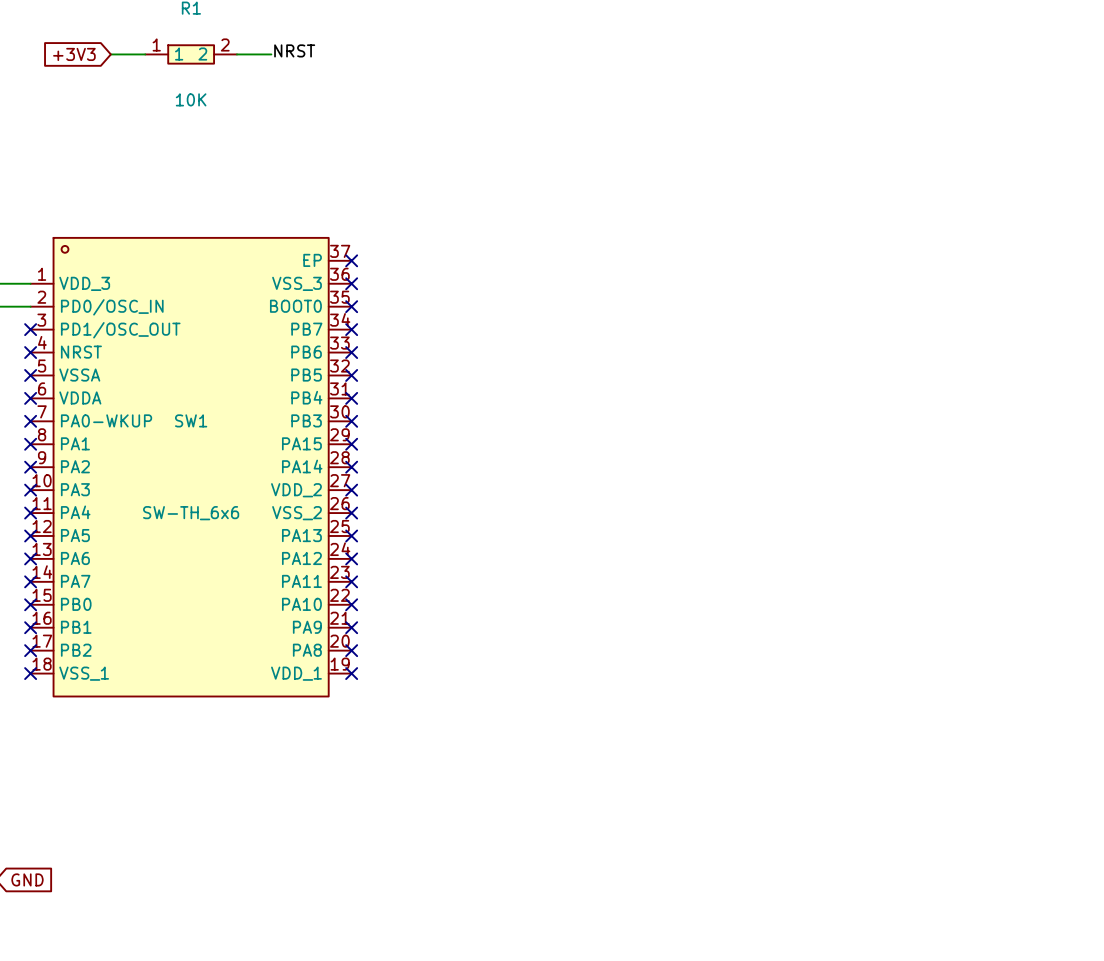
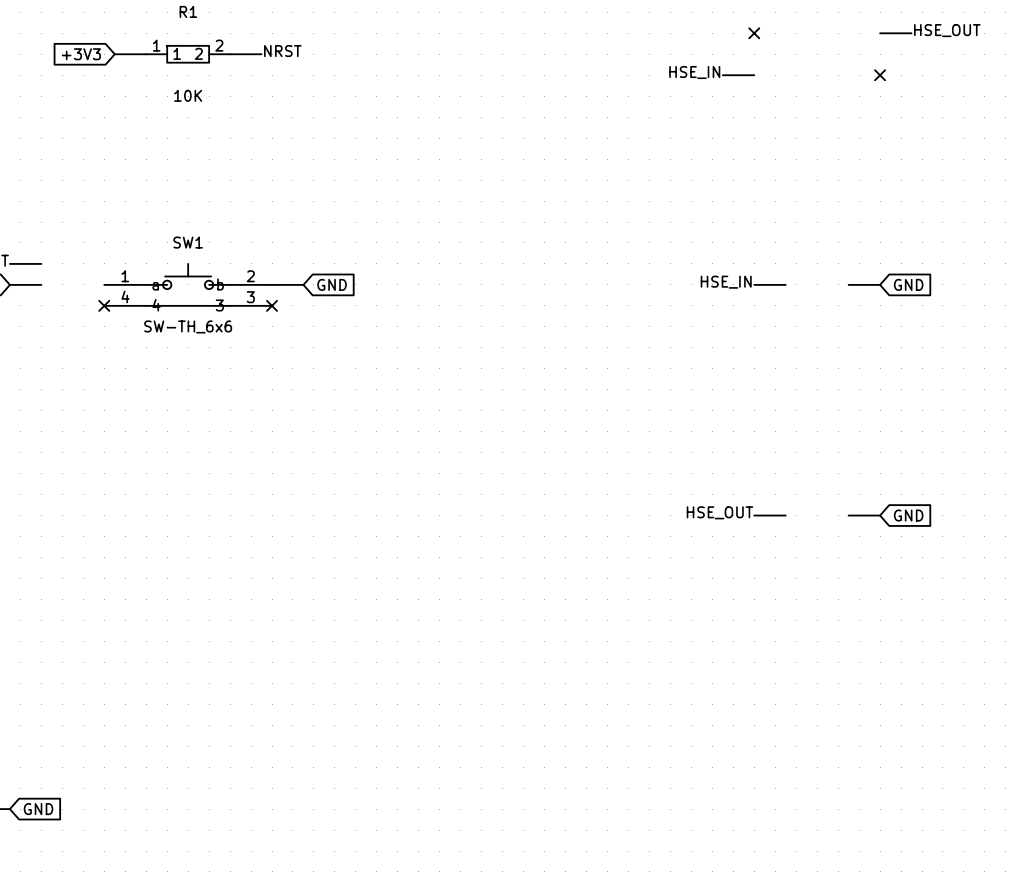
label: none -> HSE_OUT (947, 30)
no-connect mark: none -> (754, 33)
wire: none -> (880, 33) (911, 33)
label: none -> HSE_IN (694, 72)
wire: none -> (722, 75) (754, 75)
no-connect mark: none -> (880, 75)
SW1 symbol: [30, 237, 352, 697] -> [104, 263, 273, 306]
no-connect mark: (351, 260) -> none
no-connect mark: (351, 283) -> none
label: none -> HSE_IN (726, 282)
global label: none -> GND (332, 284)
no-connect mark: (351, 306) -> none
wire: none -> (754, 284) (785, 284)
wire: none -> (848, 284) (880, 284)
global label: none -> GND (908, 284)
no-connect mark: (30, 329) -> none
no-connect mark: none -> (104, 305)
no-connect mark: none -> (272, 305)
no-connect mark: (351, 329) -> none
no-connect mark: (30, 352) -> none
no-connect mark: (351, 352) -> none
no-connect mark: (30, 375) -> none
no-connect mark: (351, 375) -> none
no-connect mark: (30, 398) -> none
no-connect mark: (351, 398) -> none
no-connect mark: (30, 421) -> none
no-connect mark: (351, 421) -> none
no-connect mark: (30, 444) -> none
no-connect mark: (351, 444) -> none
no-connect mark: (30, 467) -> none
no-connect mark: (351, 467) -> none
no-connect mark: (30, 490) -> none
no-connect mark: (351, 490) -> none
no-connect mark: (30, 513) -> none
no-connect mark: (351, 513) -> none
no-connect mark: (30, 535) -> none
no-connect mark: (351, 535) -> none
label: none -> HSE_OUT (719, 512)
no-connect mark: (30, 558) -> none
no-connect mark: (351, 558) -> none
wire: none -> (754, 515) (785, 515)
wire: none -> (848, 515) (880, 515)
global label: none -> GND (908, 515)
no-connect mark: (30, 581) -> none
no-connect mark: (351, 581) -> none
no-connect mark: (30, 604) -> none
no-connect mark: (351, 604) -> none
no-connect mark: (30, 627) -> none
no-connect mark: (351, 627) -> none
no-connect mark: (30, 650) -> none
no-connect mark: (351, 650) -> none
no-connect mark: (30, 673) -> none
no-connect mark: (351, 673) -> none

